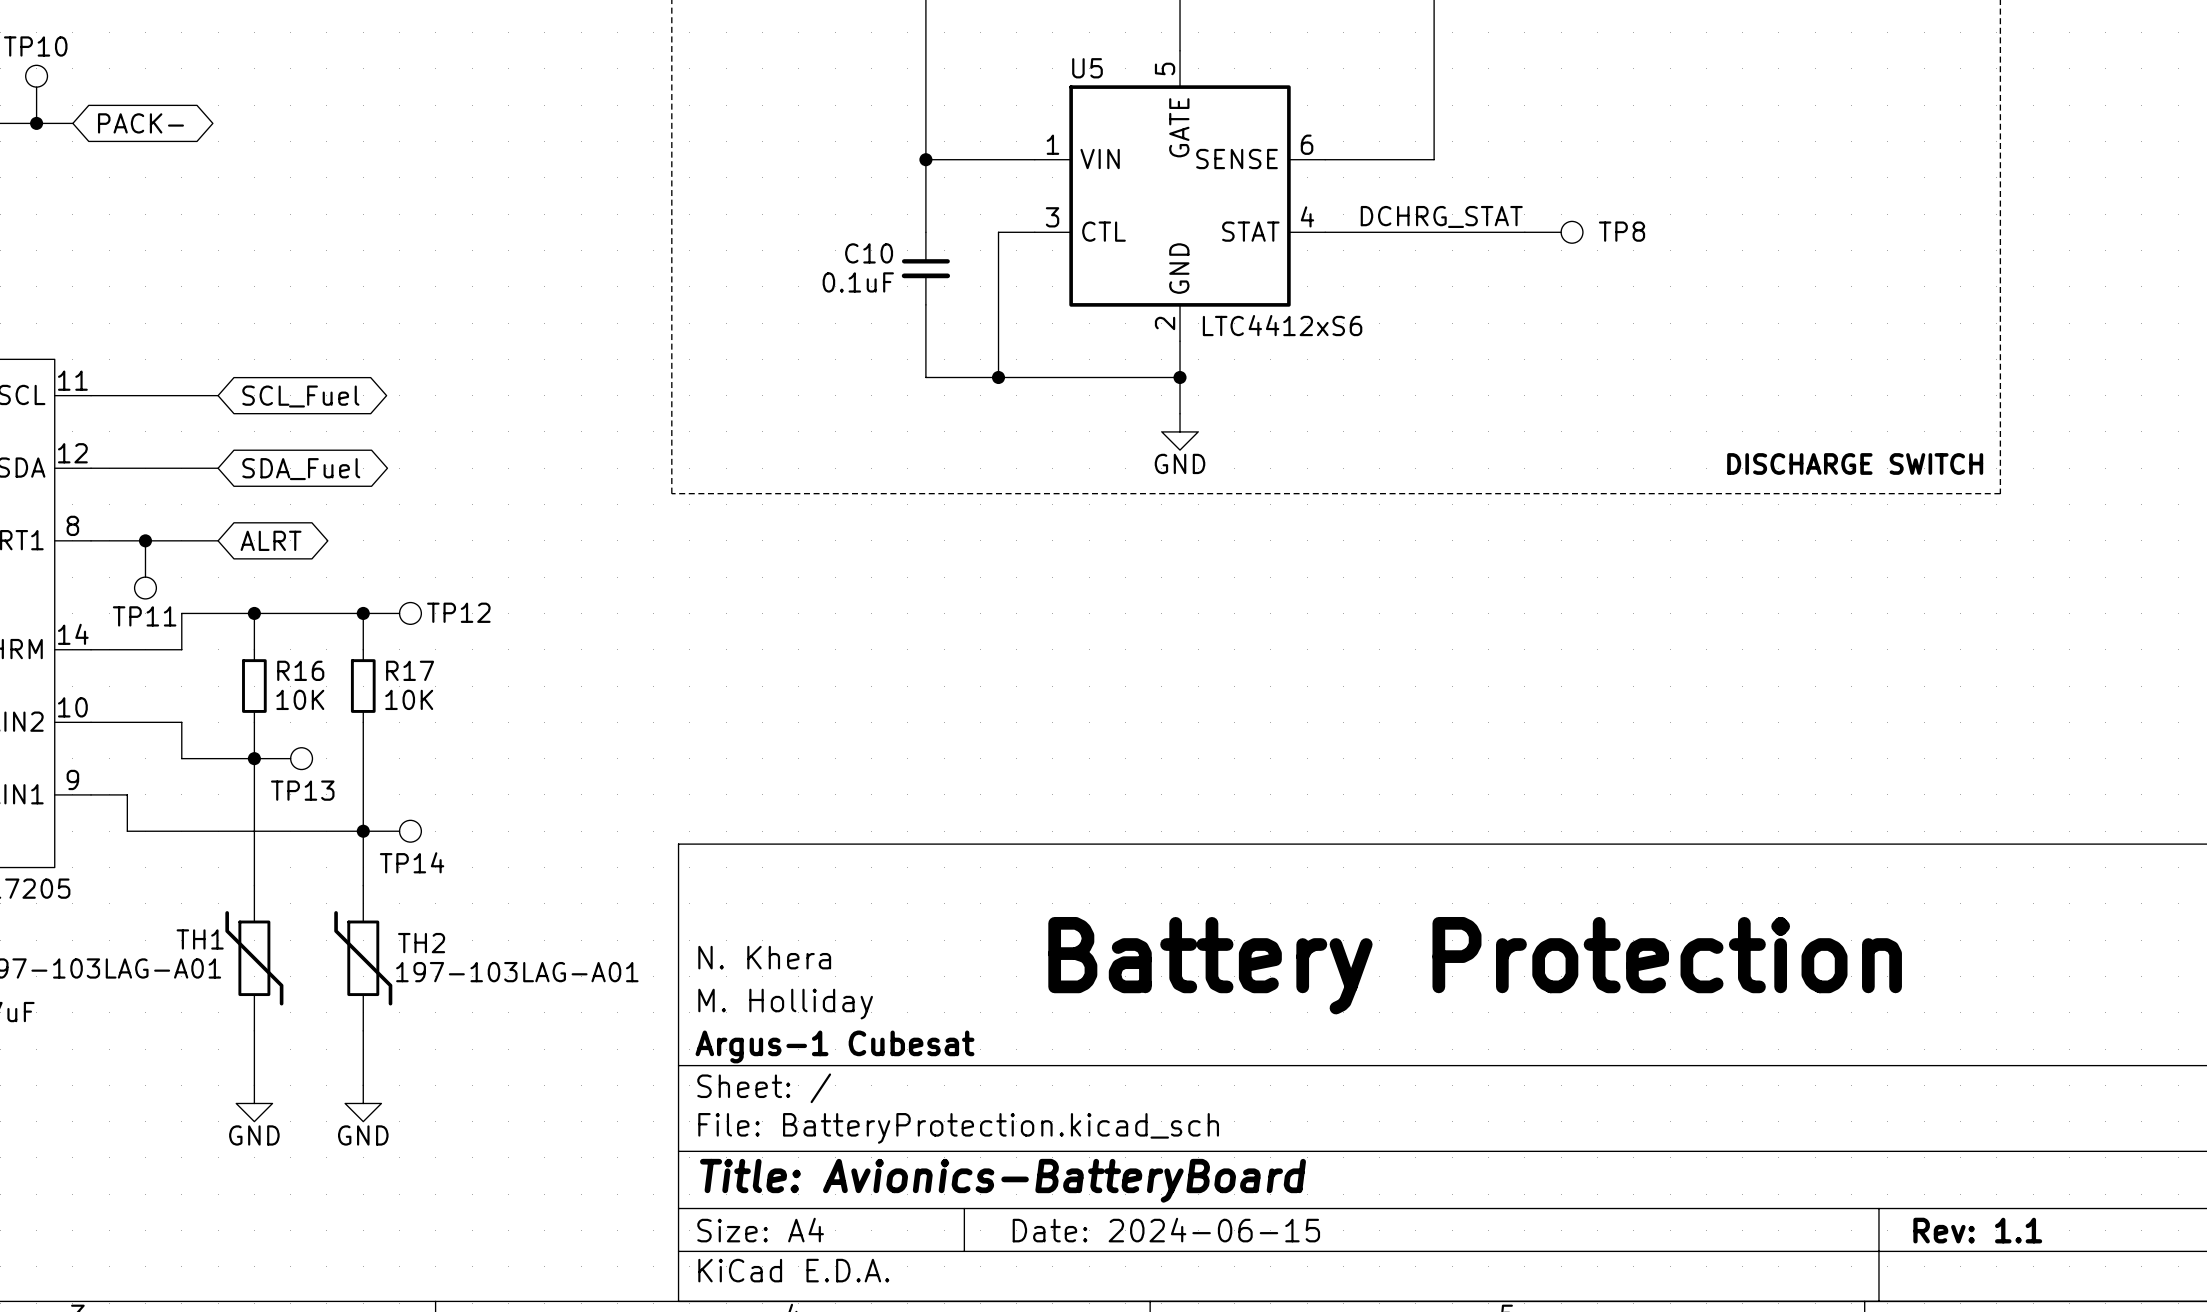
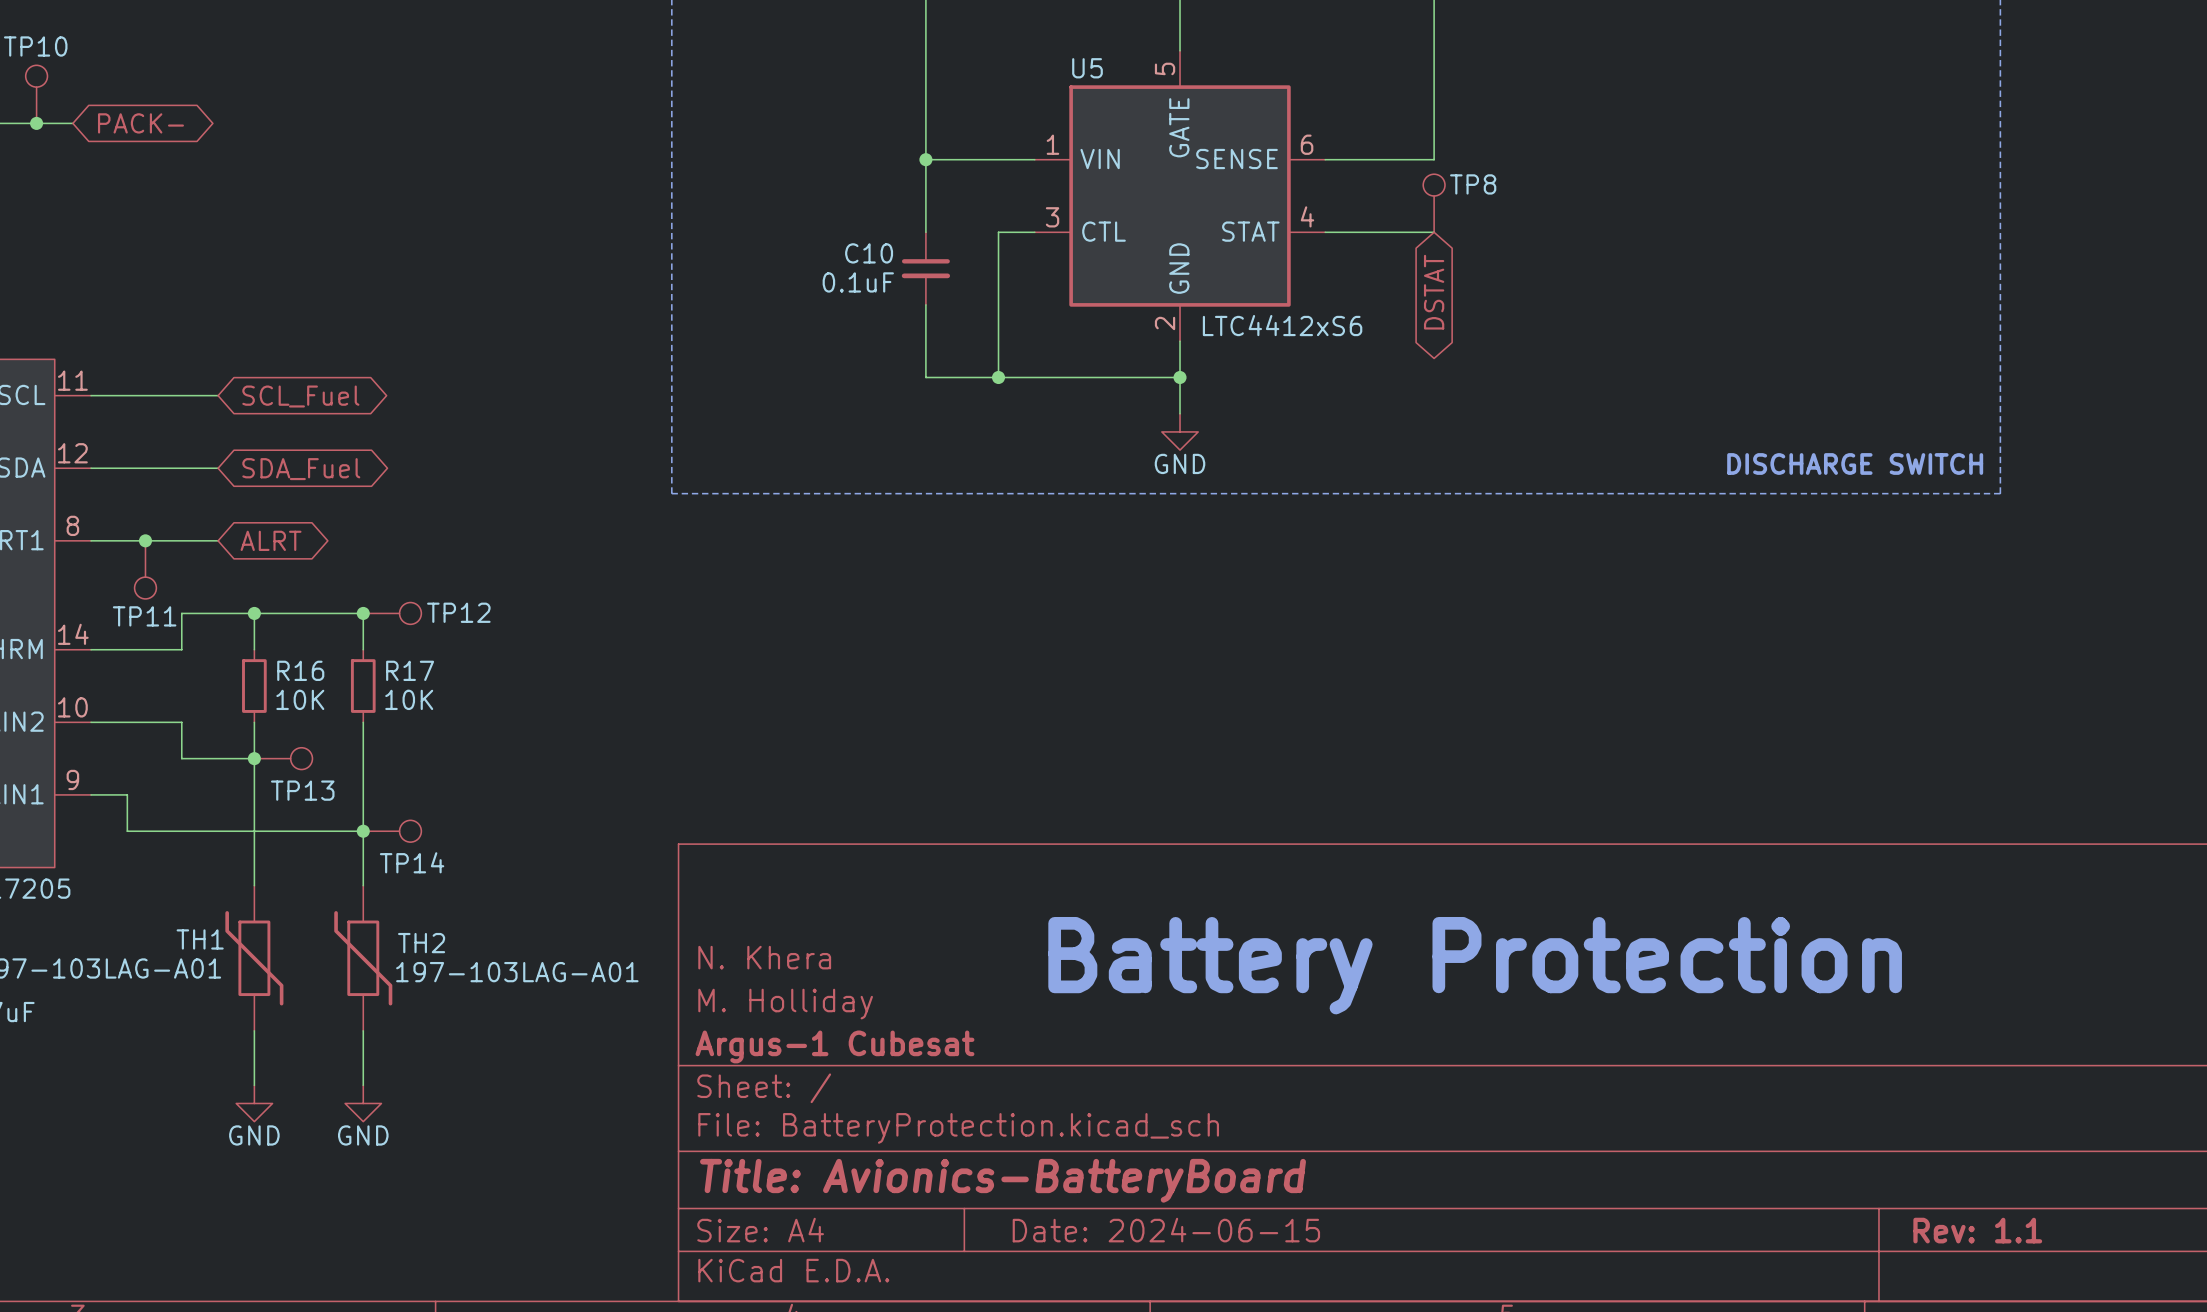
label: DCHRG_STAT (1441, 216) -> none
TP8 name position: TP8 (1621, 231) -> TP8 (1473, 184)
wire: (1434, 232) (1524, 232) -> none
TP8 position: (1553, 232) -> (1434, 203)
TP8 rotation: 0° (1572, 232) -> 90° counterclockwise (1434, 185)
global label: none -> DSTAT (1434, 292)

